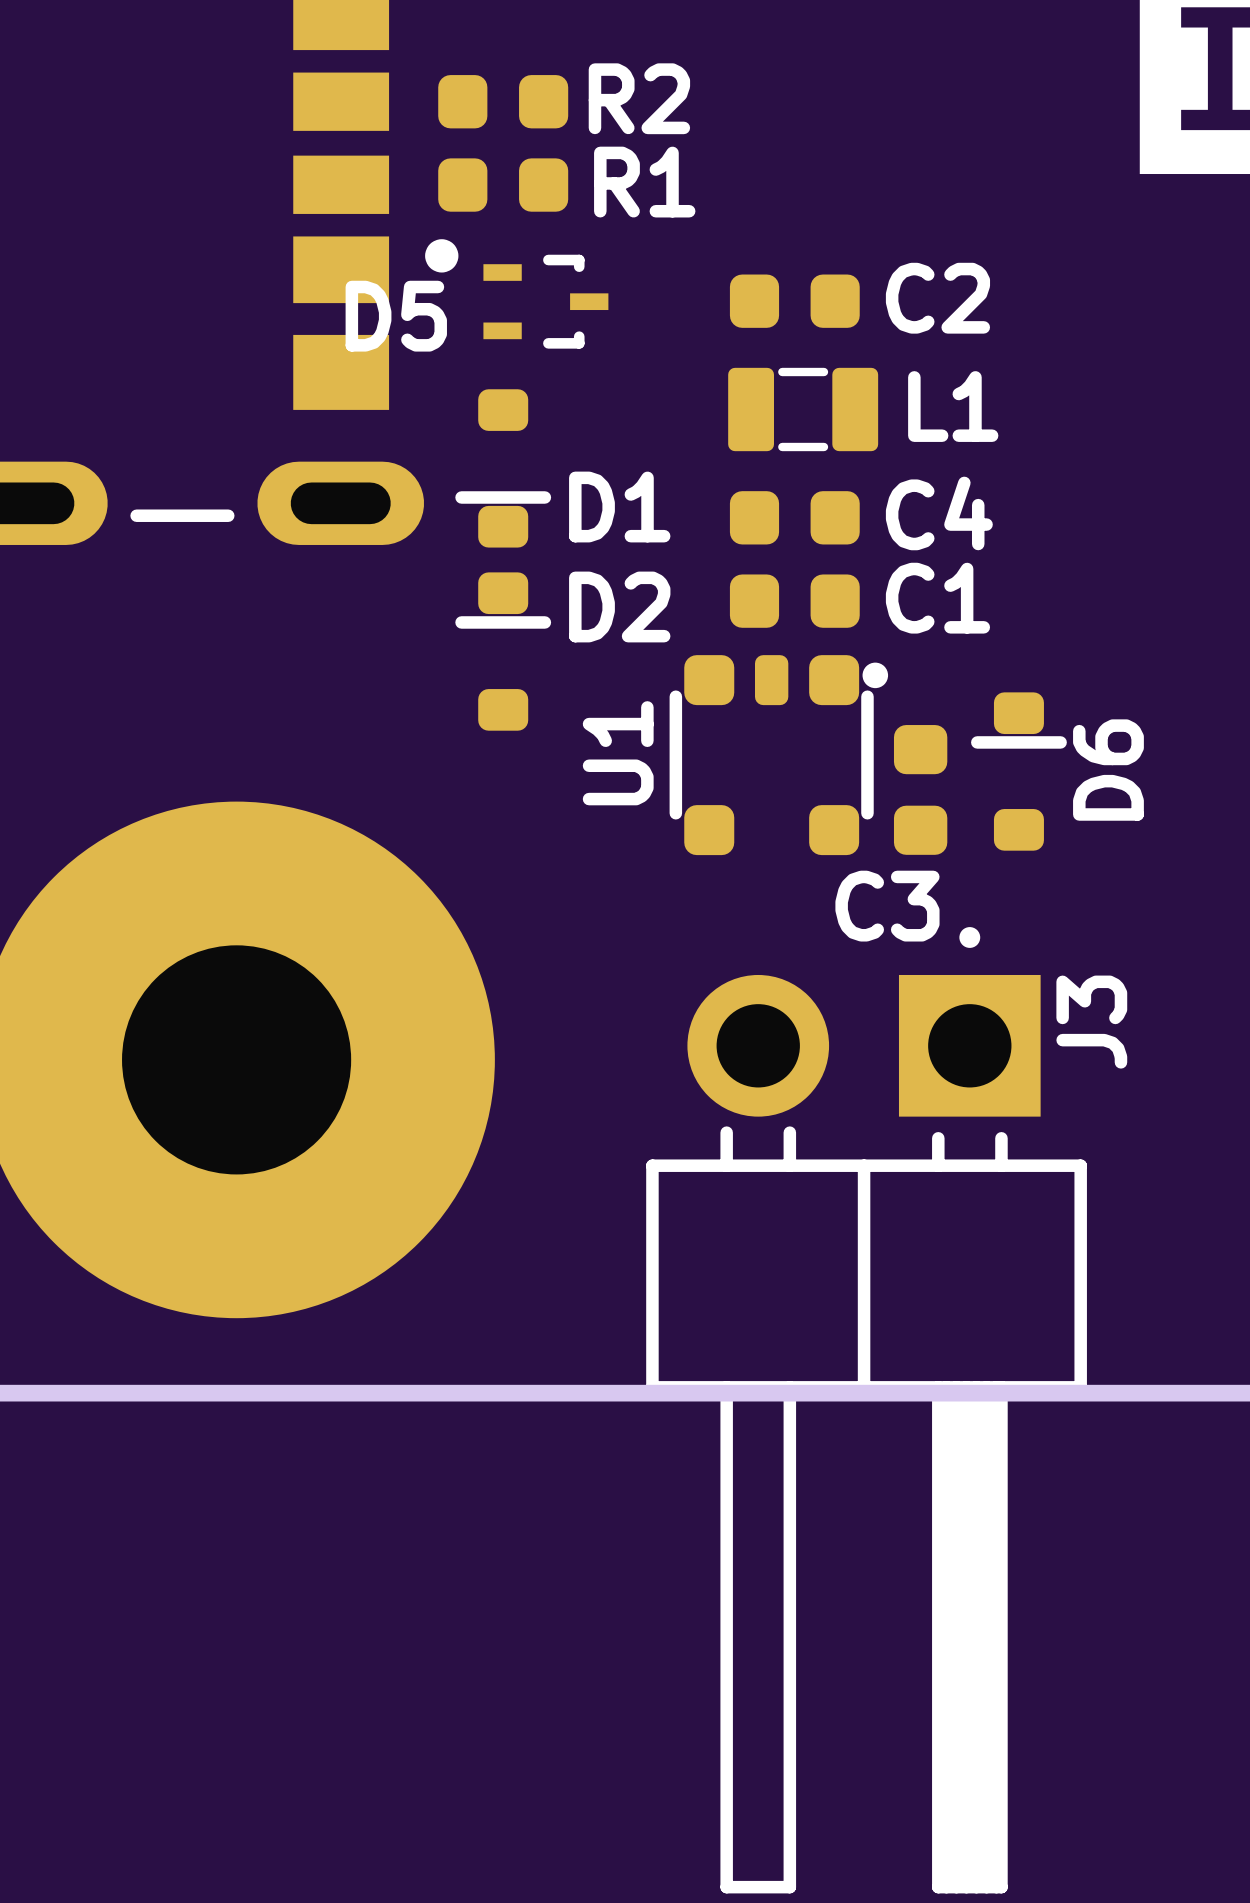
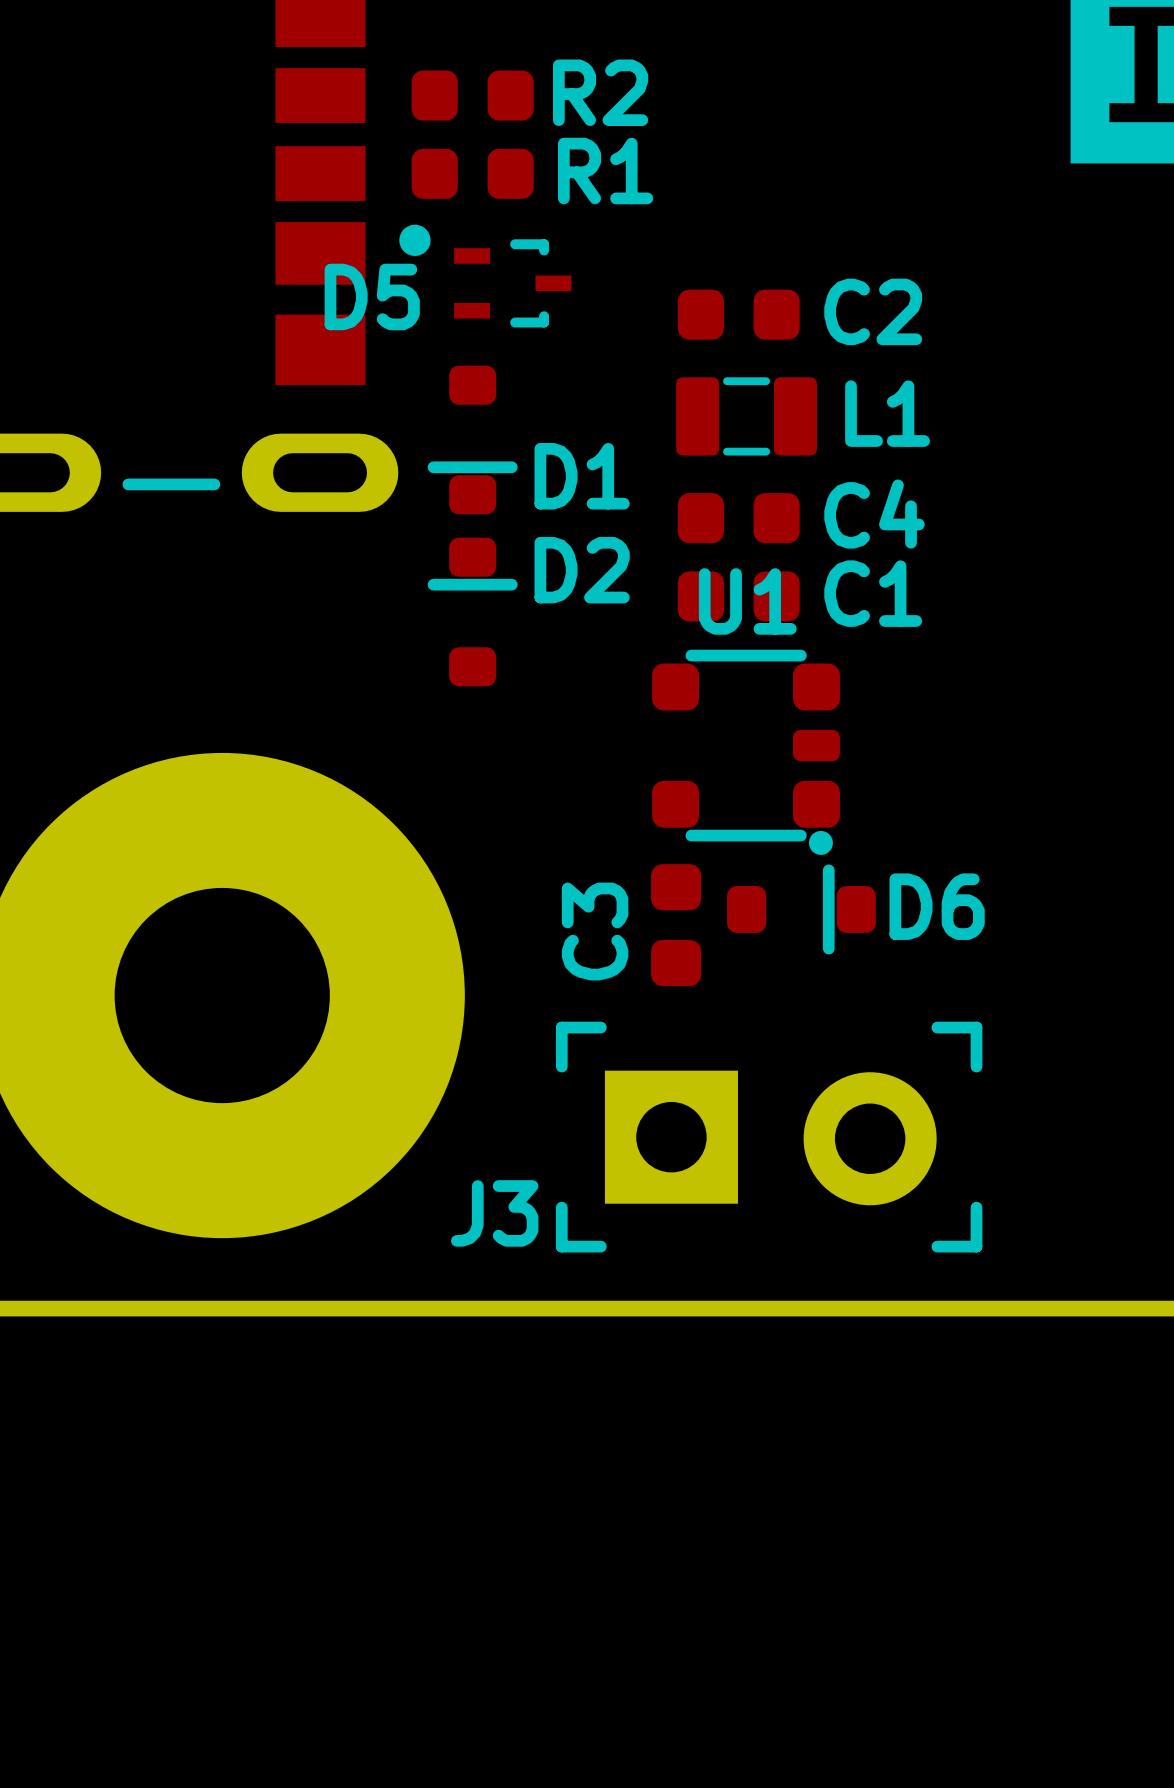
C2 position: (794, 301) -> (738, 314)
L1 position: (803, 409) -> (746, 416)
C4 position: (794, 517) -> (738, 518)
C1 position: (794, 601) -> (738, 596)
U1 rotation: 0° (778, 755) -> 90° clockwise (746, 752)
D6 rotation: 0° (1018, 771) -> 90° clockwise (801, 909)
D6 position: (1018, 771) -> (801, 909)
C3 position: (920, 789) -> (676, 925)
C3 name rotation: 0° (887, 906) -> 90° counterclockwise (595, 931)
J3 footprint: [646, 927, 1087, 1894] -> [555, 1021, 983, 1253]
J3 name position: J3 (1091, 1022) -> J3 (494, 1213)

